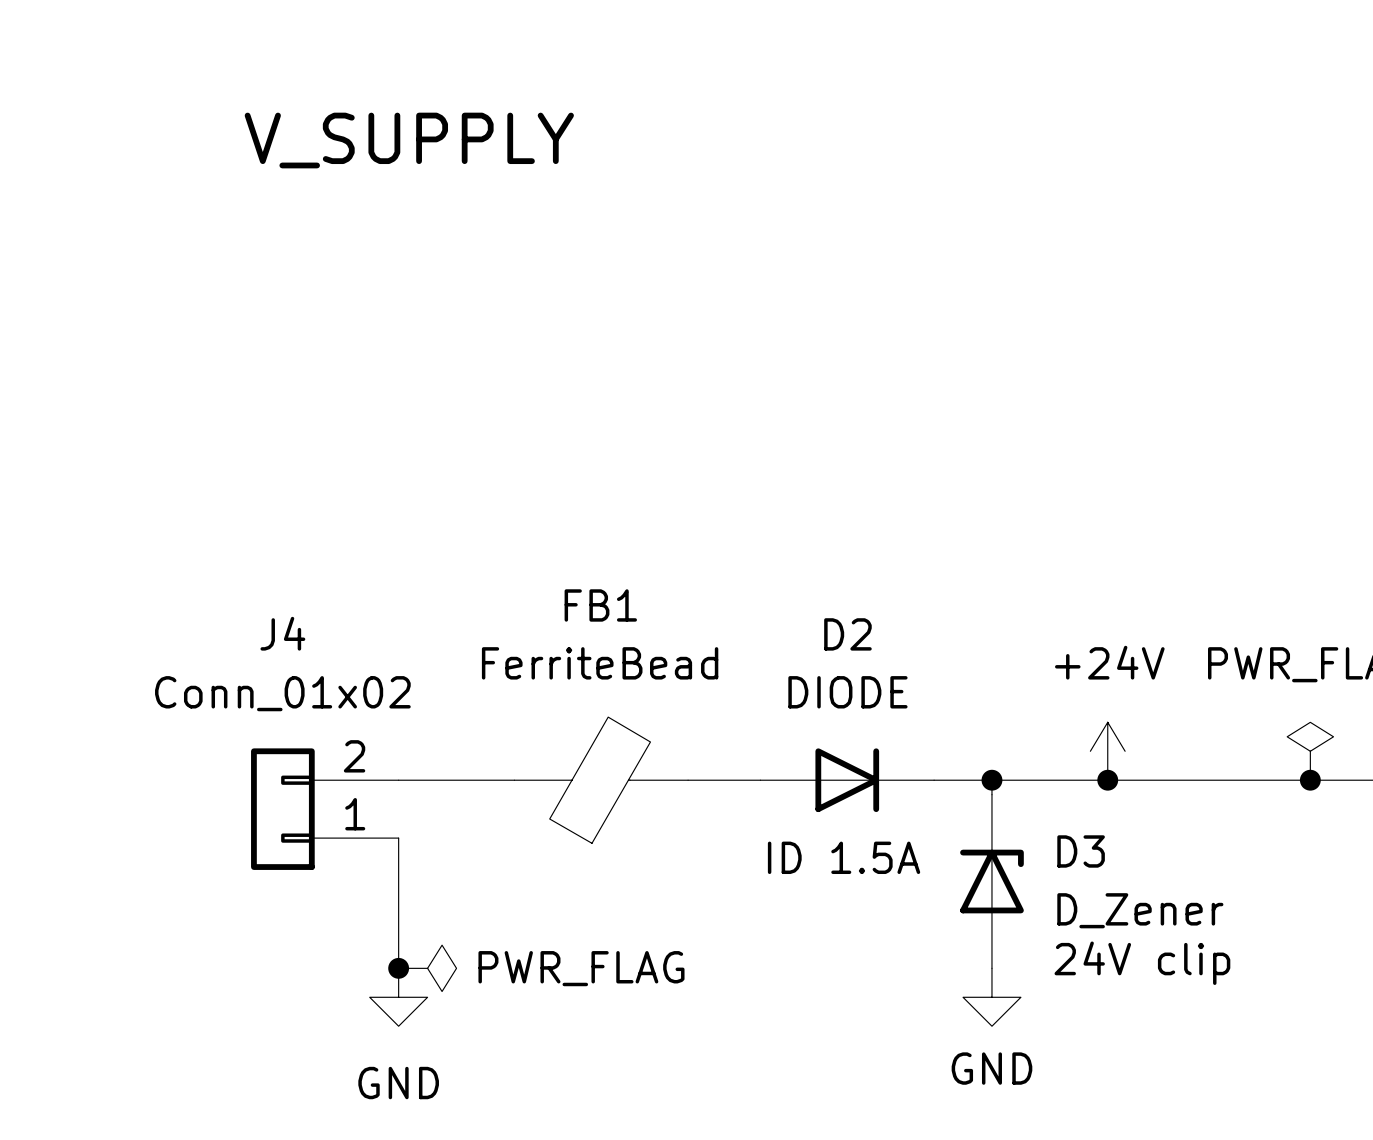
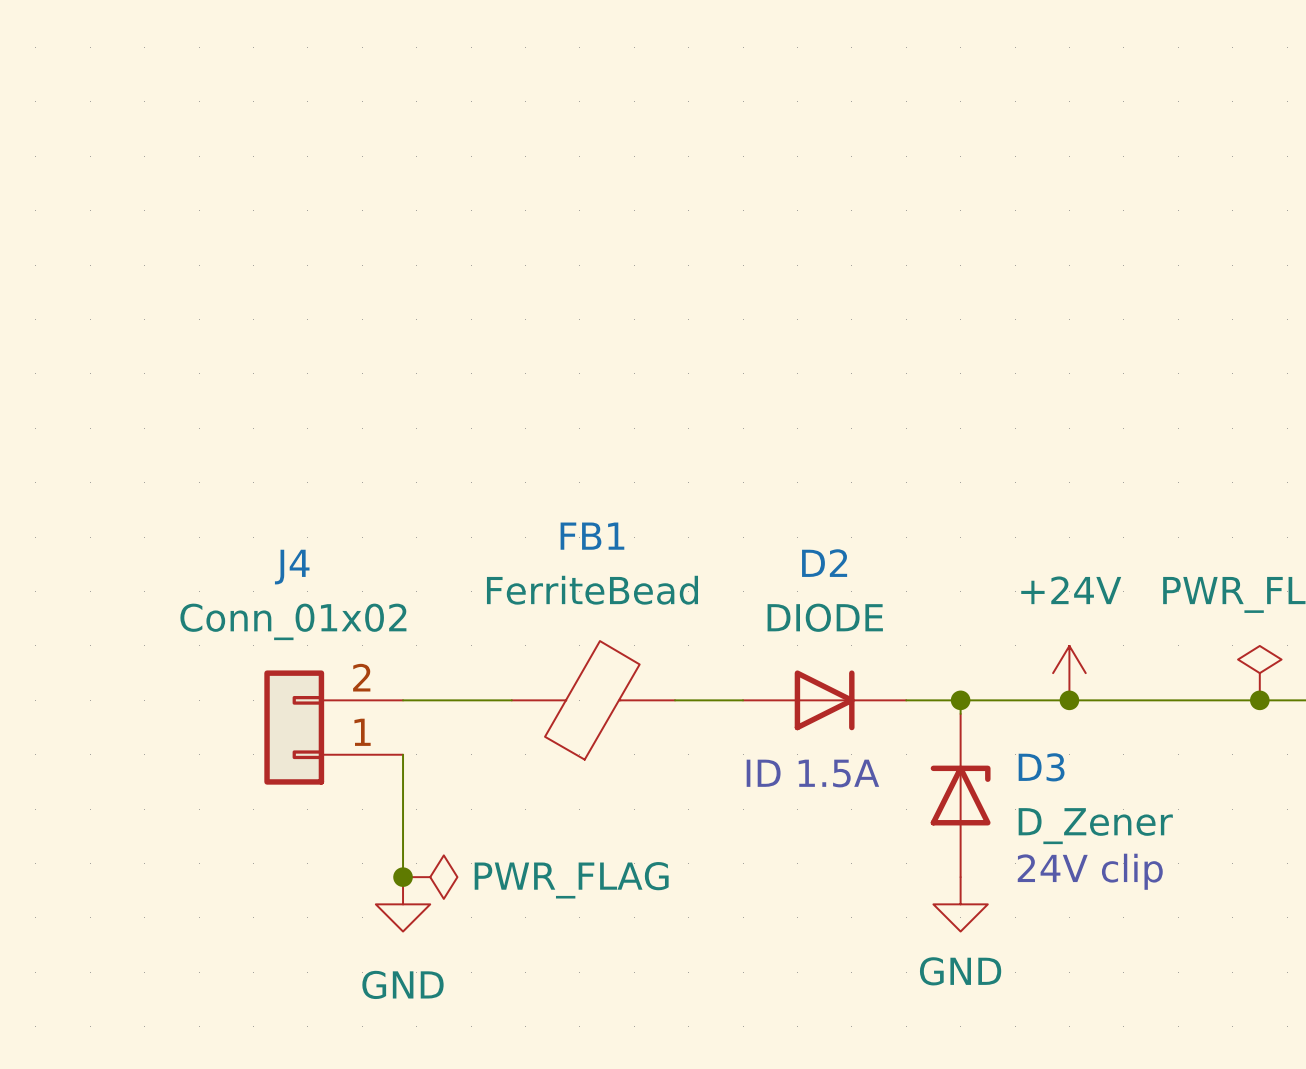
text: V_SUPPLY (409, 140) -> none

